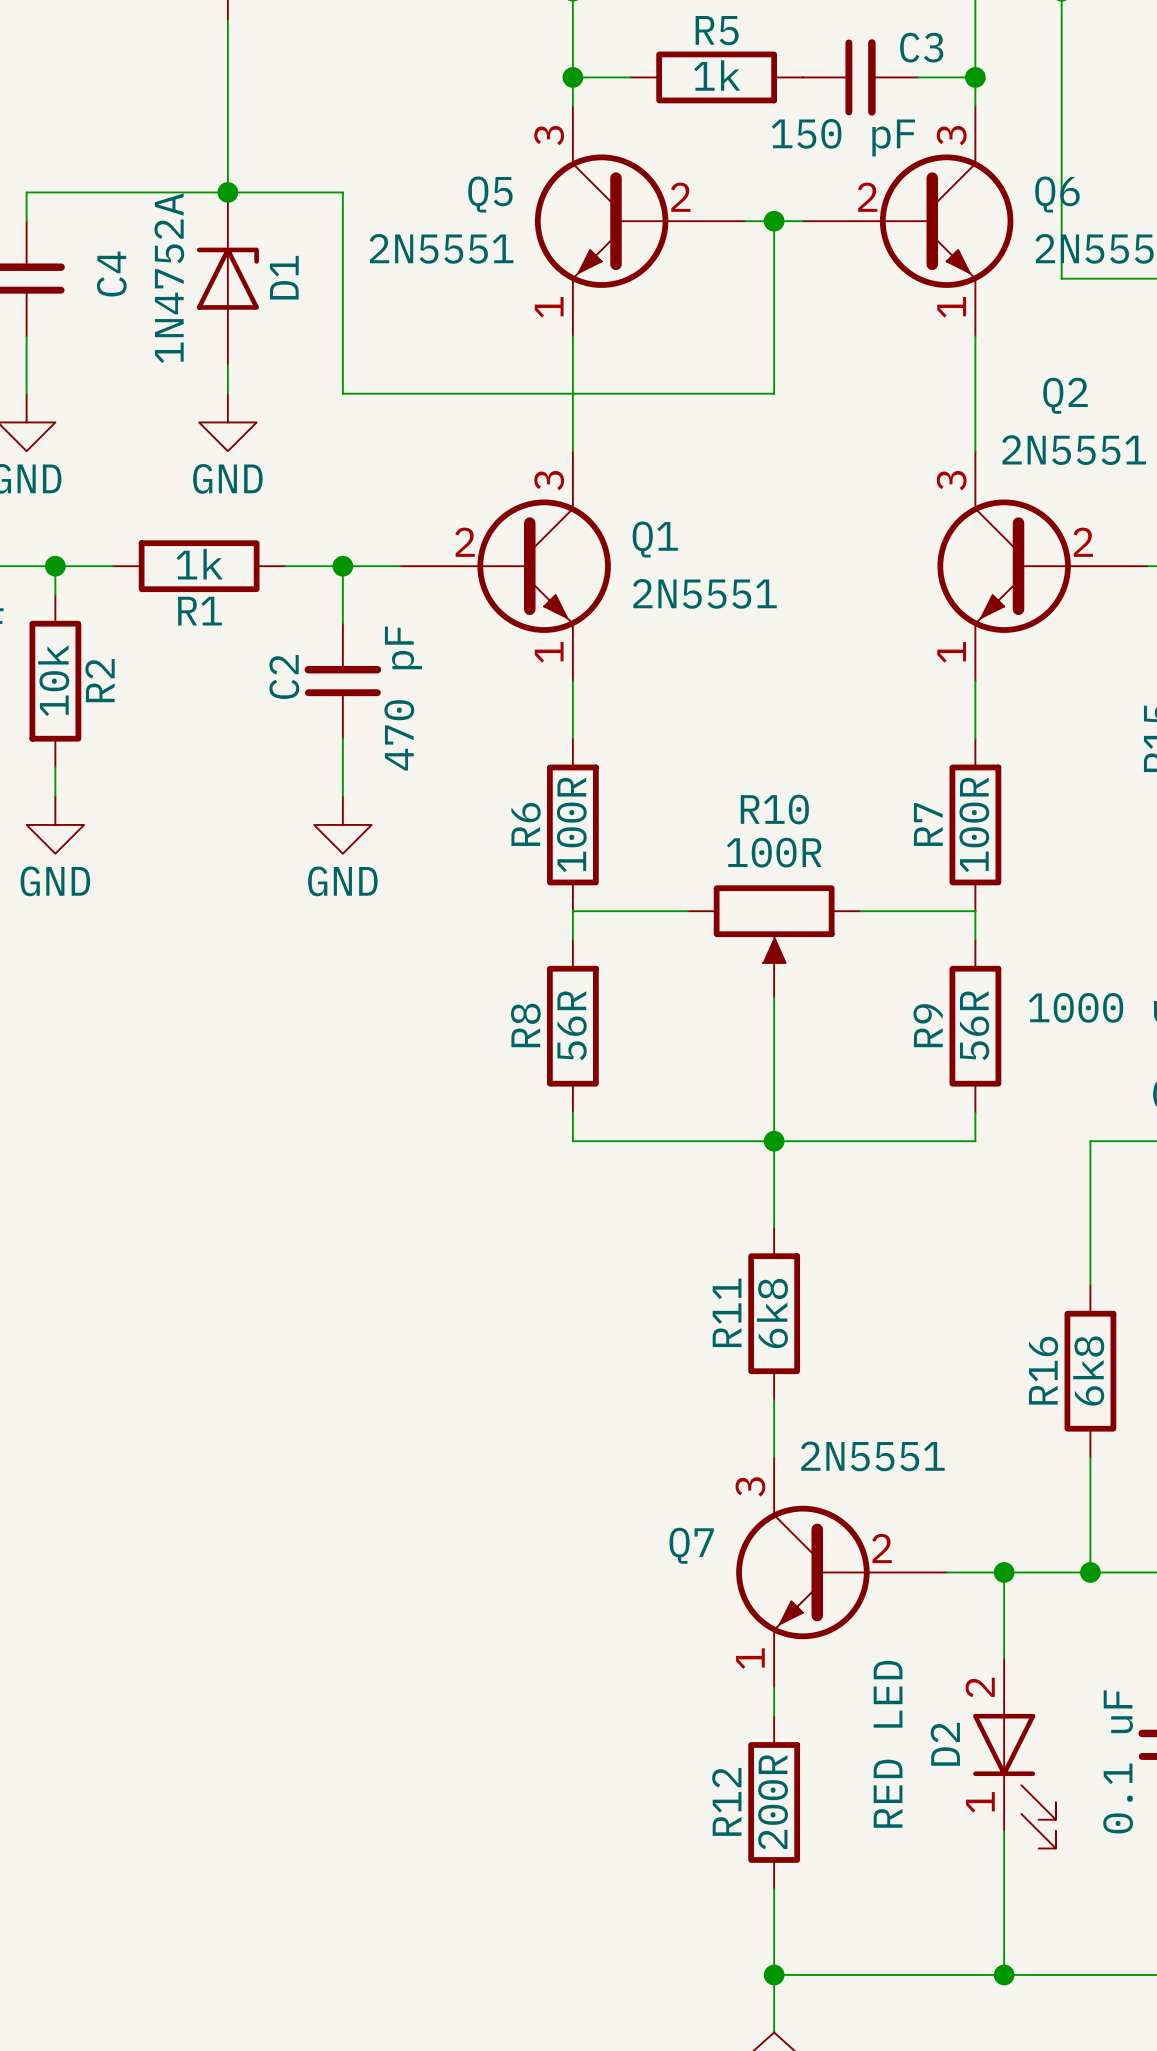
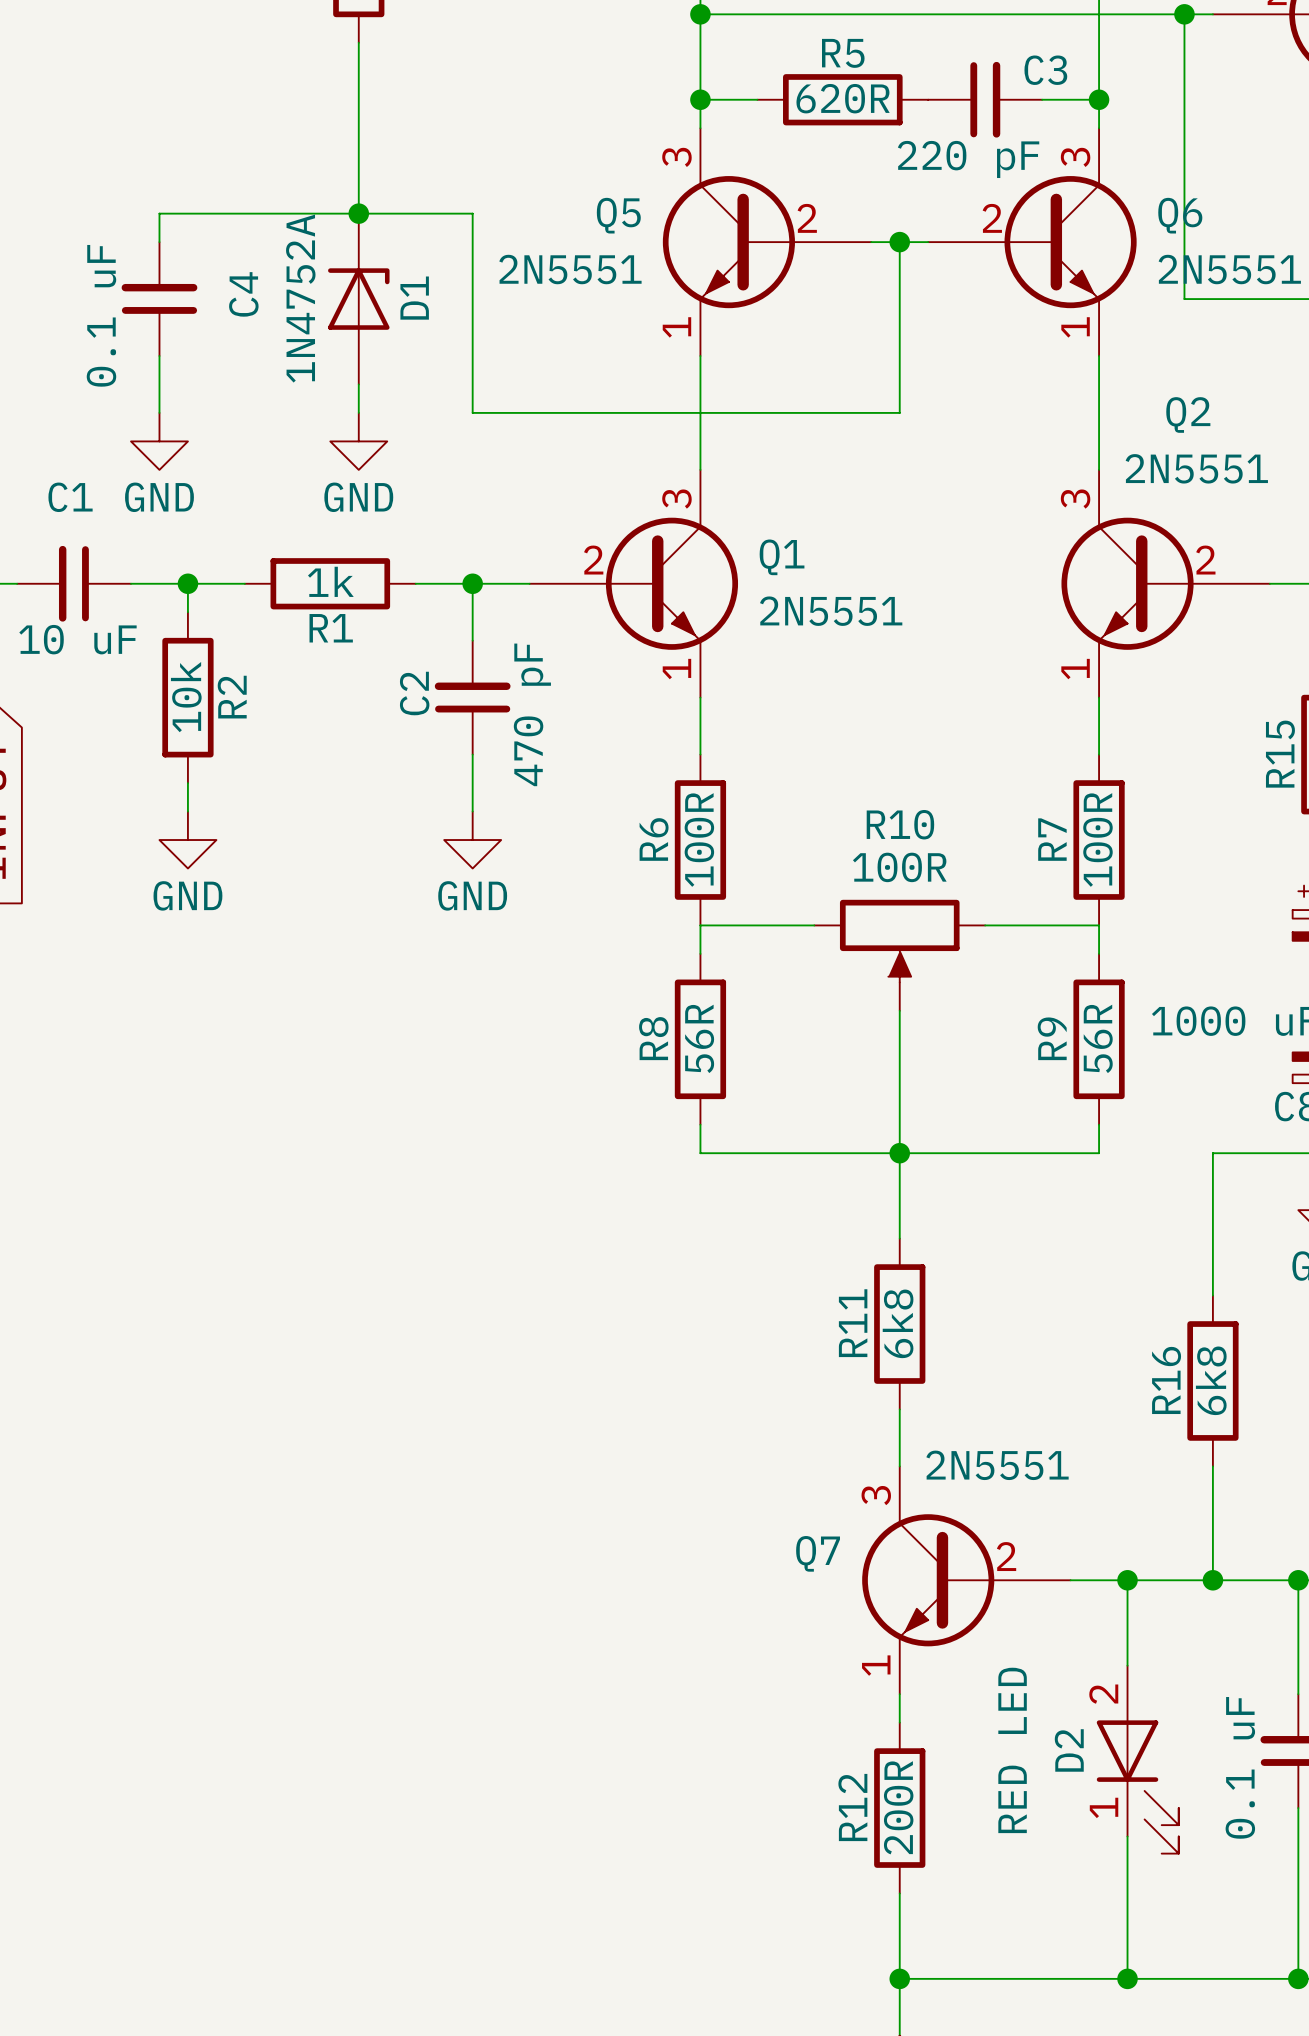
R5 value: 1k (717, 75) -> 620R (843, 98)
C3 value: 150 pF (843, 137) -> 220 pF (968, 159)

